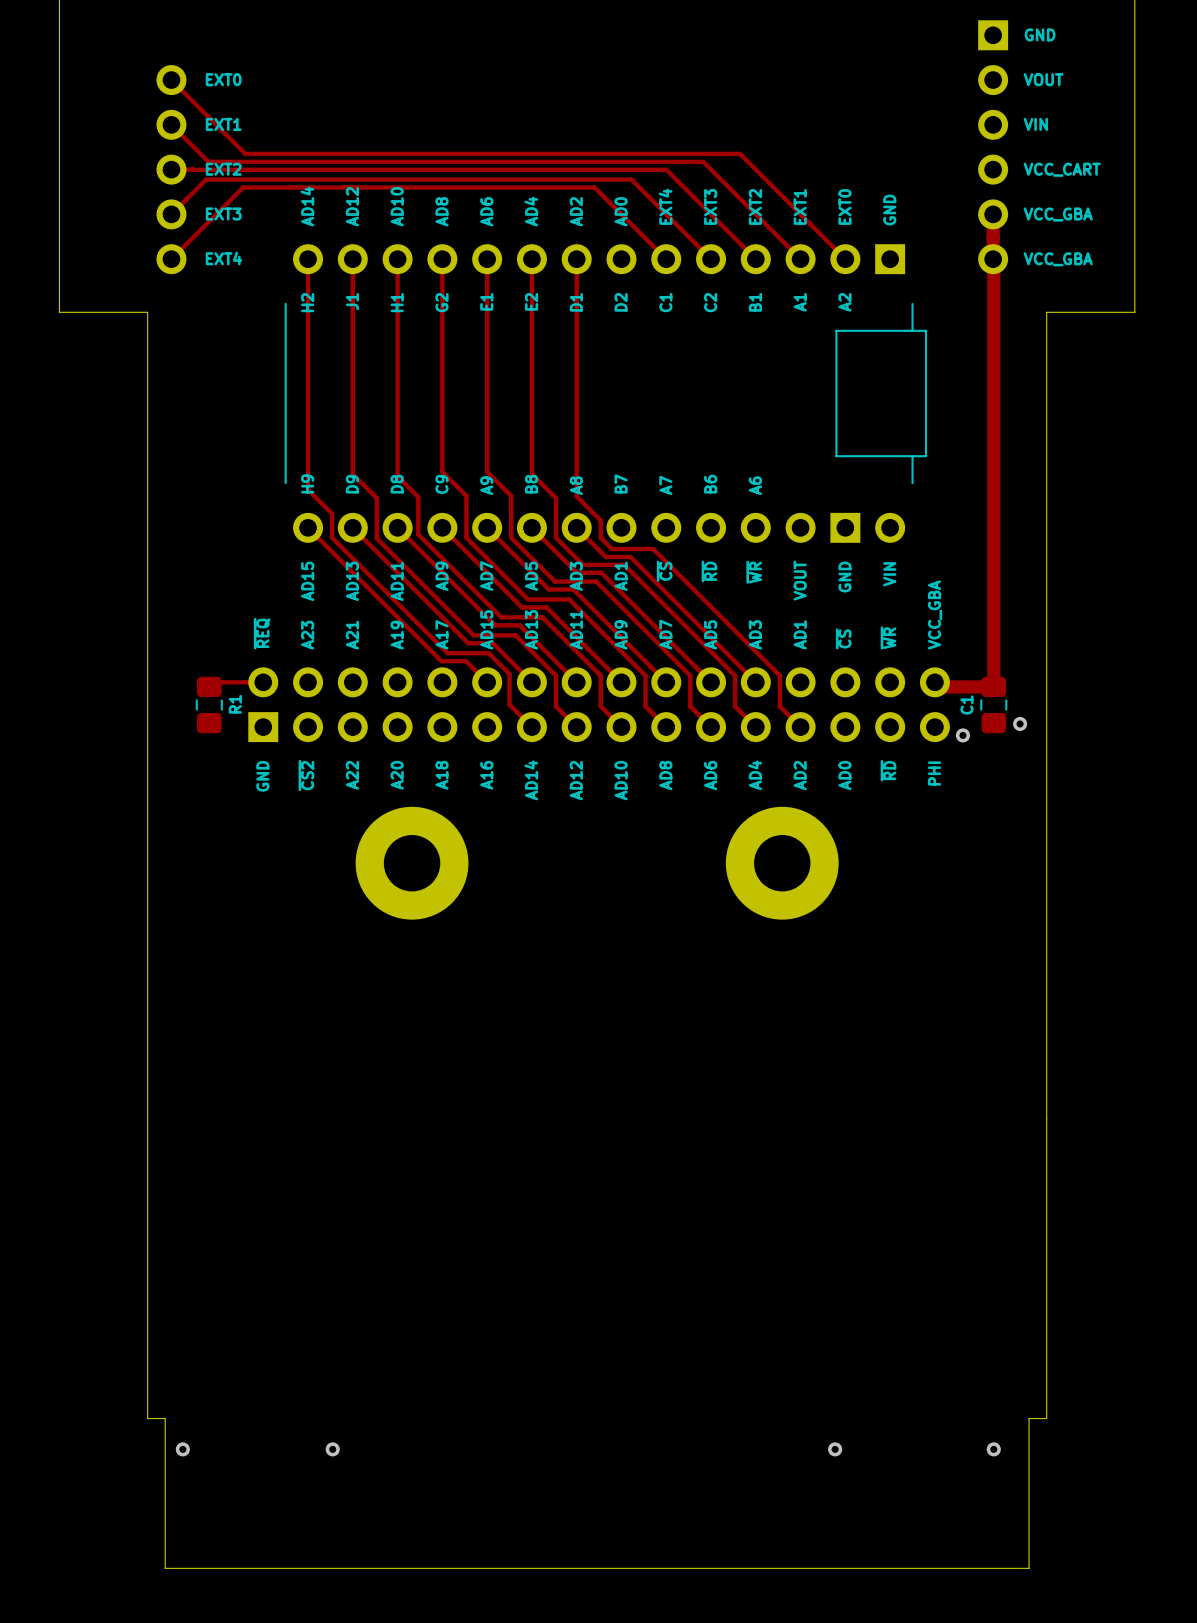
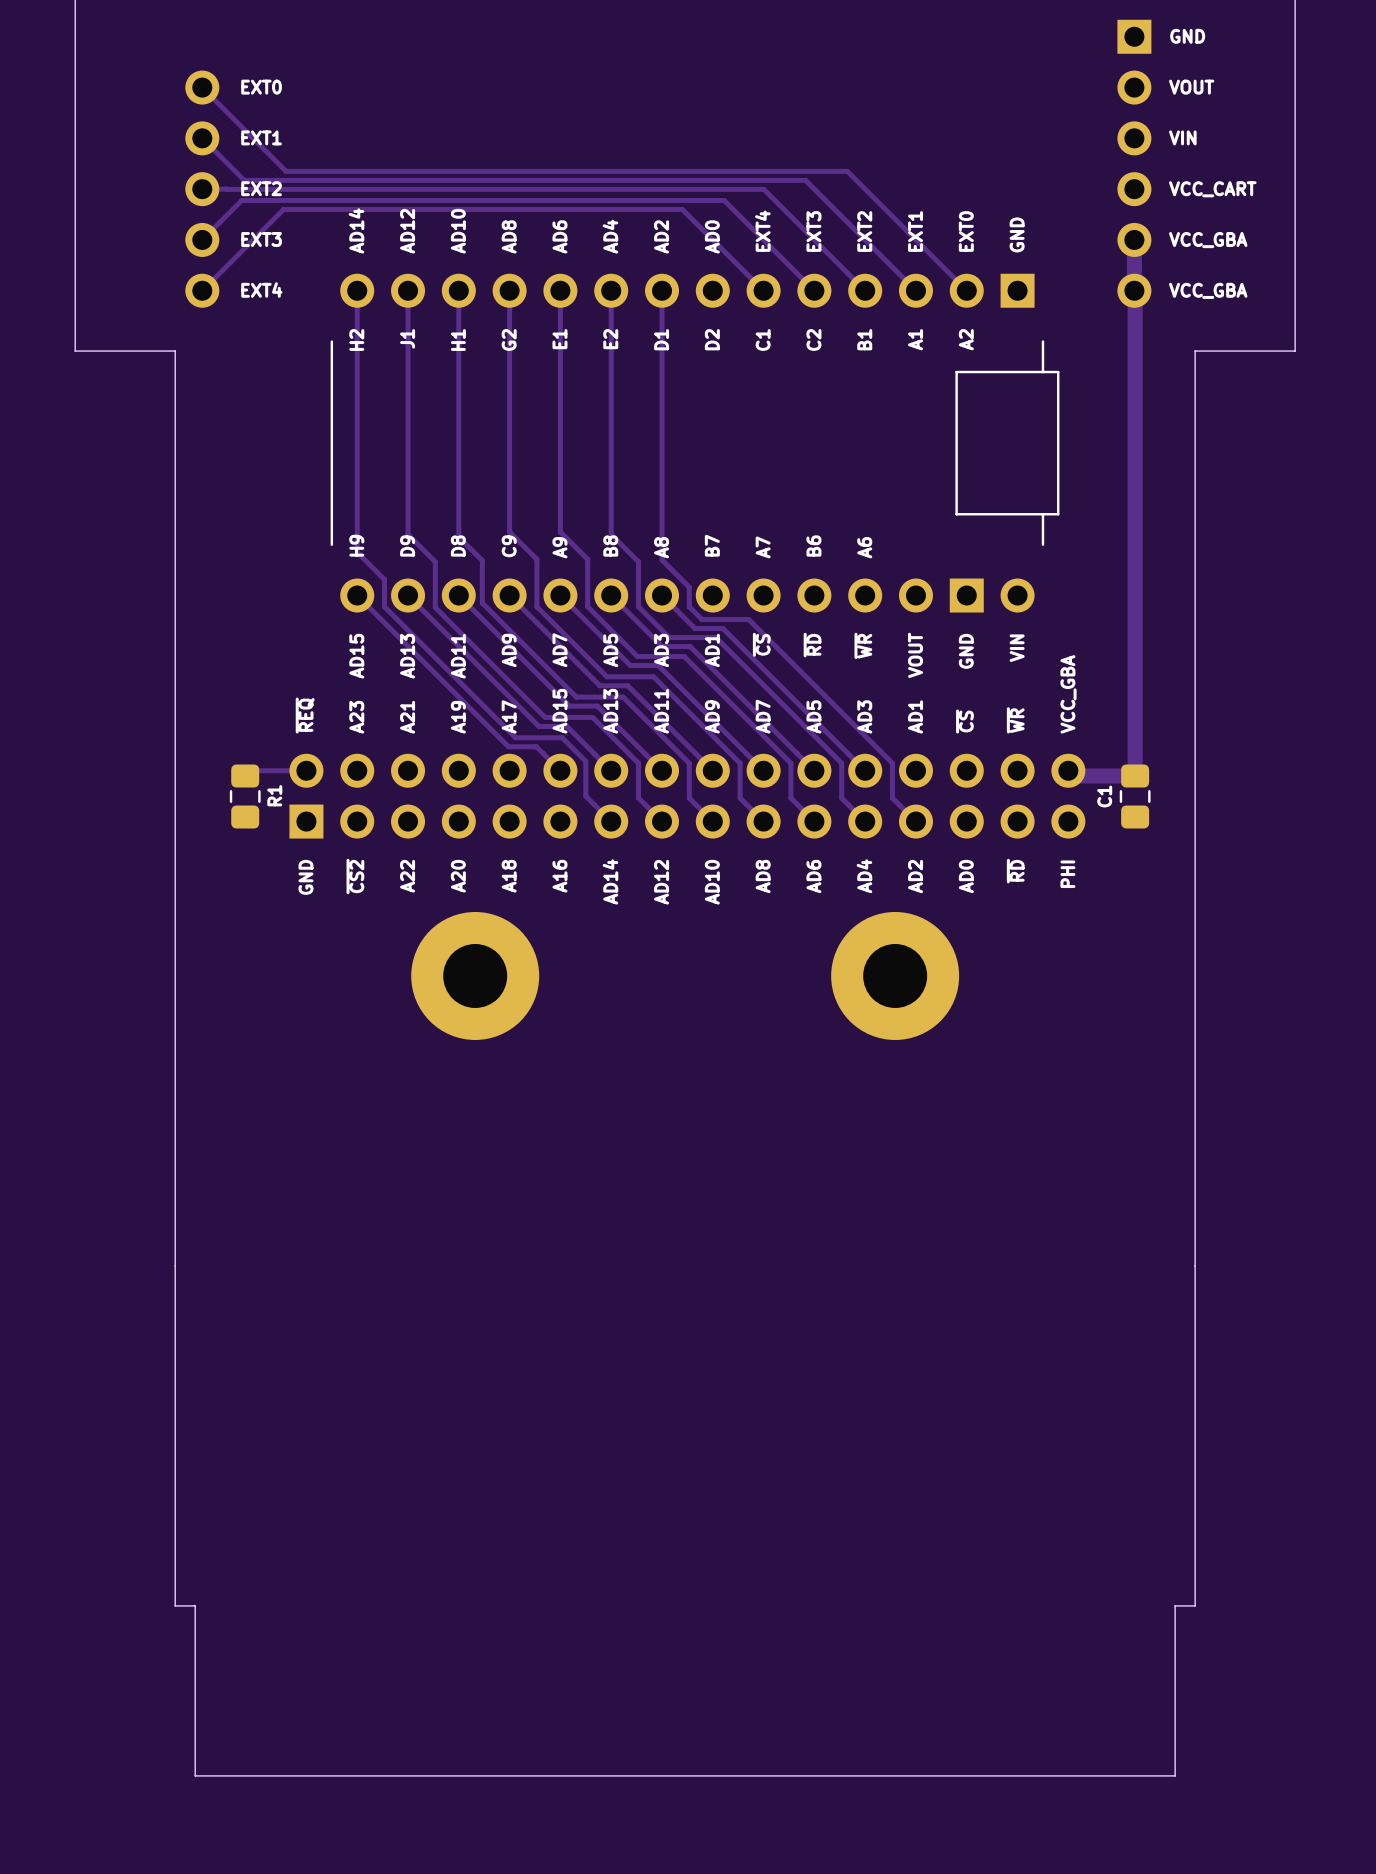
via: (1020, 723) -> none
via: (962, 735) -> none
via: (182, 1449) -> none
via: (332, 1449) -> none
via: (835, 1449) -> none
via: (993, 1449) -> none

